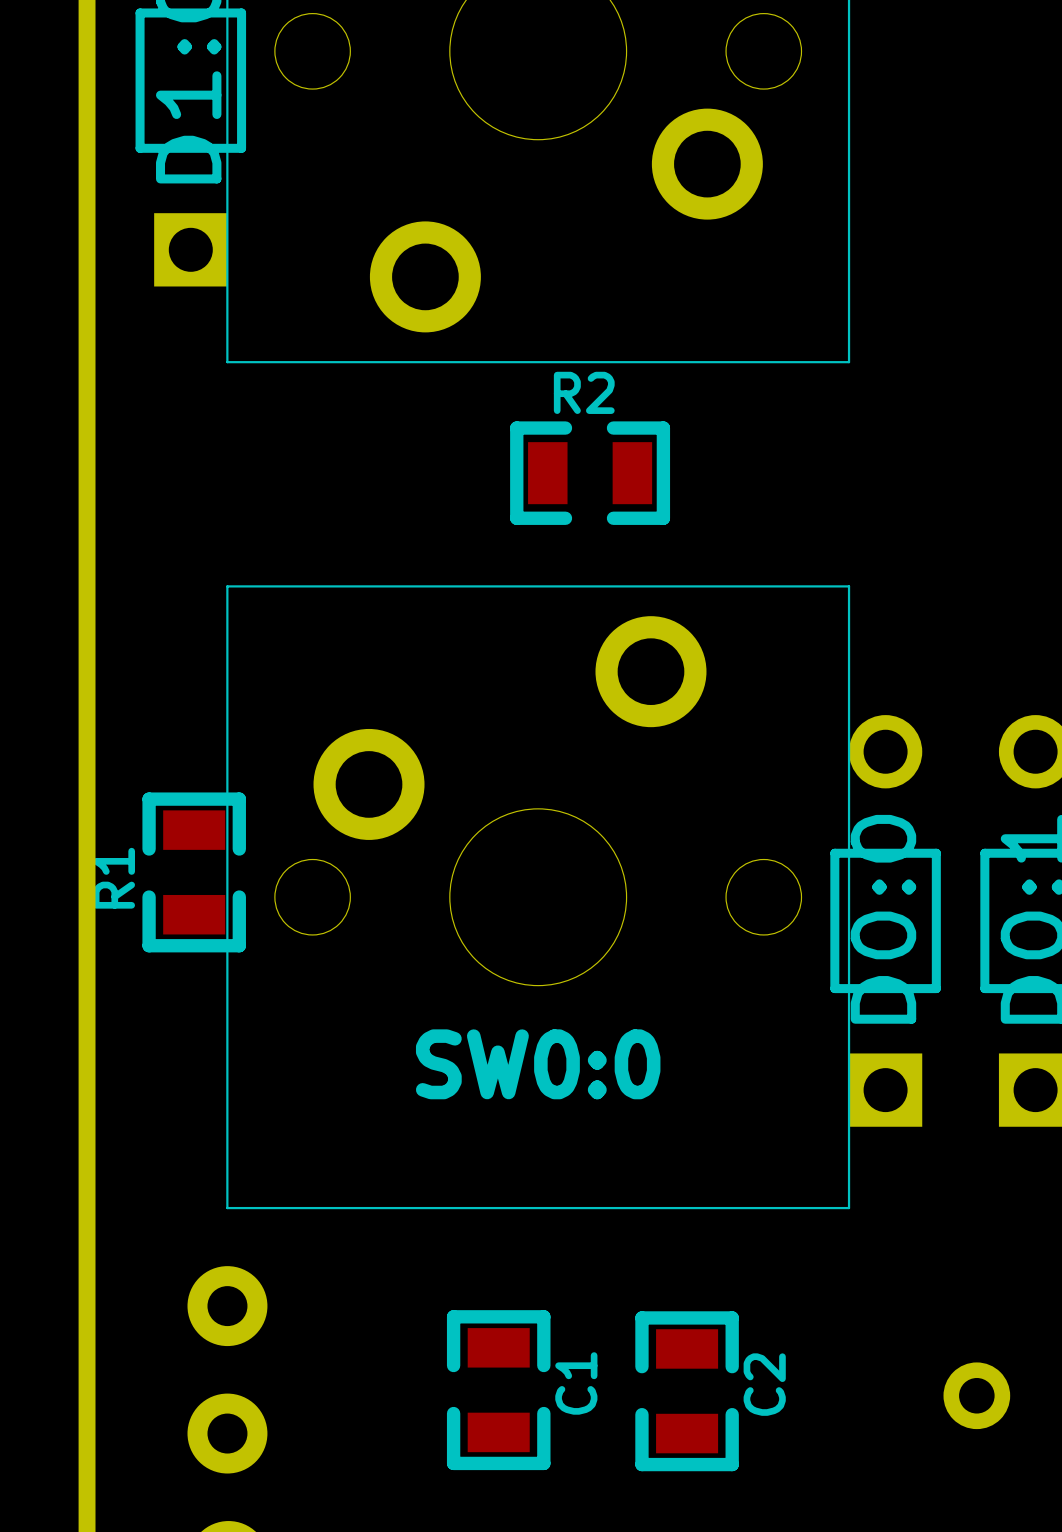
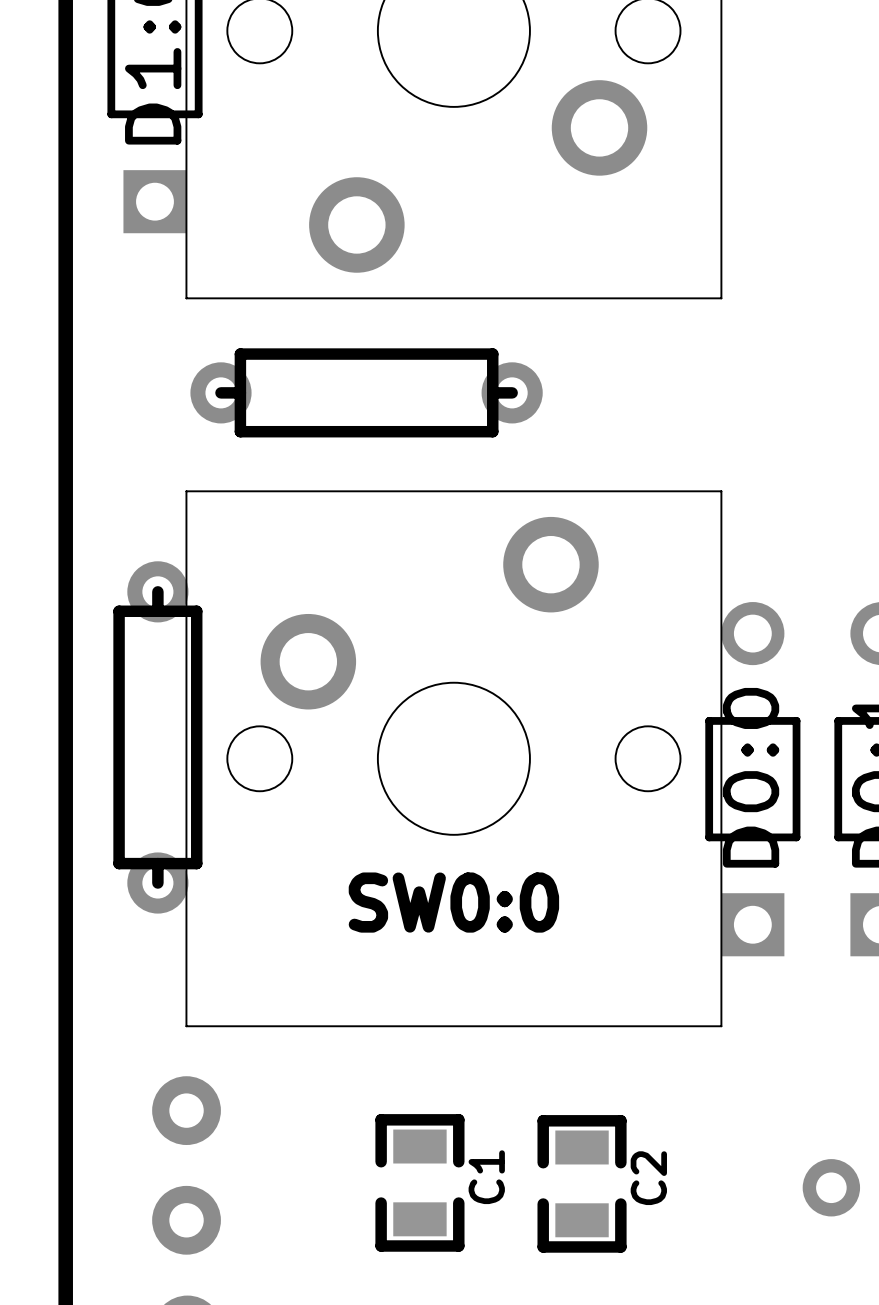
part: none -> (366, 392)
R2: (590, 473) -> none
R1: (194, 872) -> none
part: none -> (157, 737)

